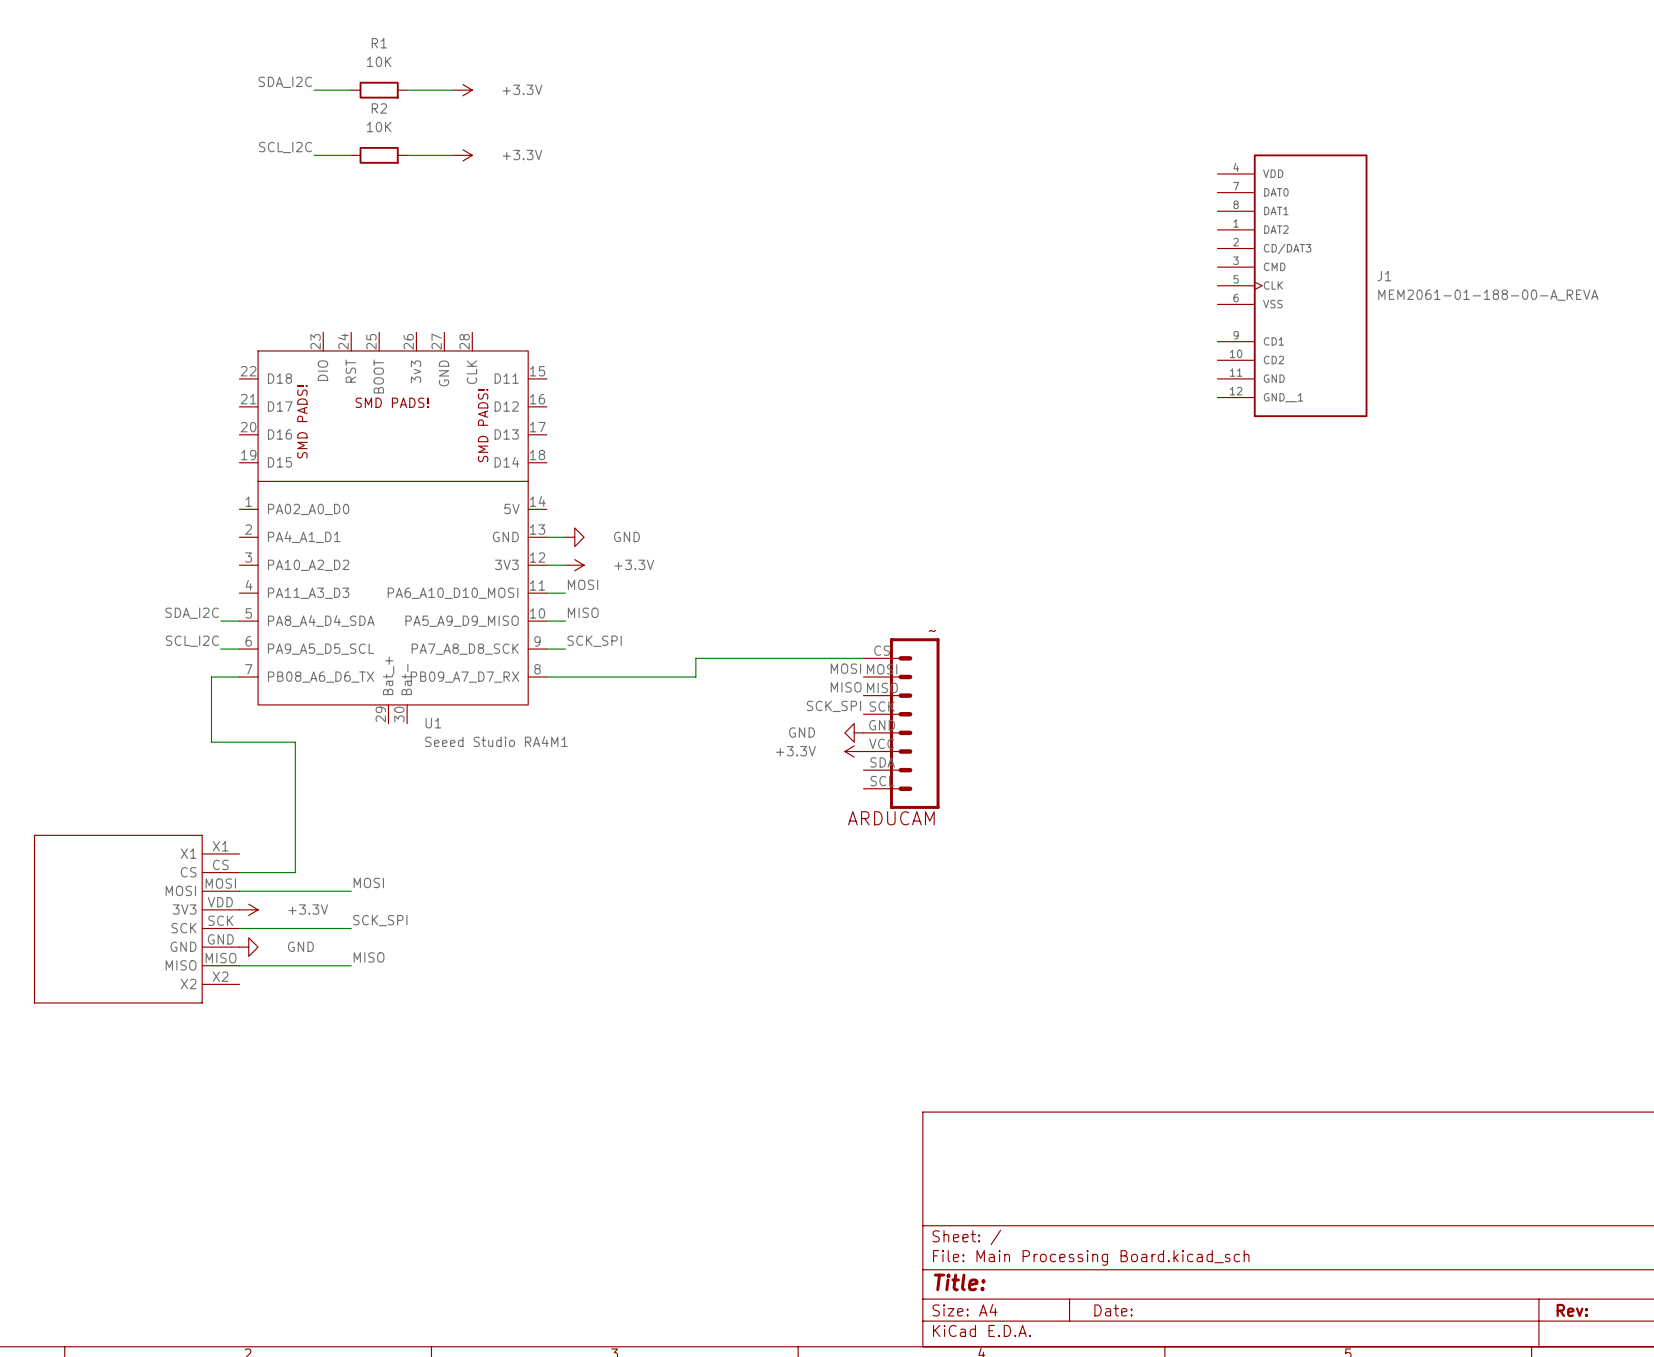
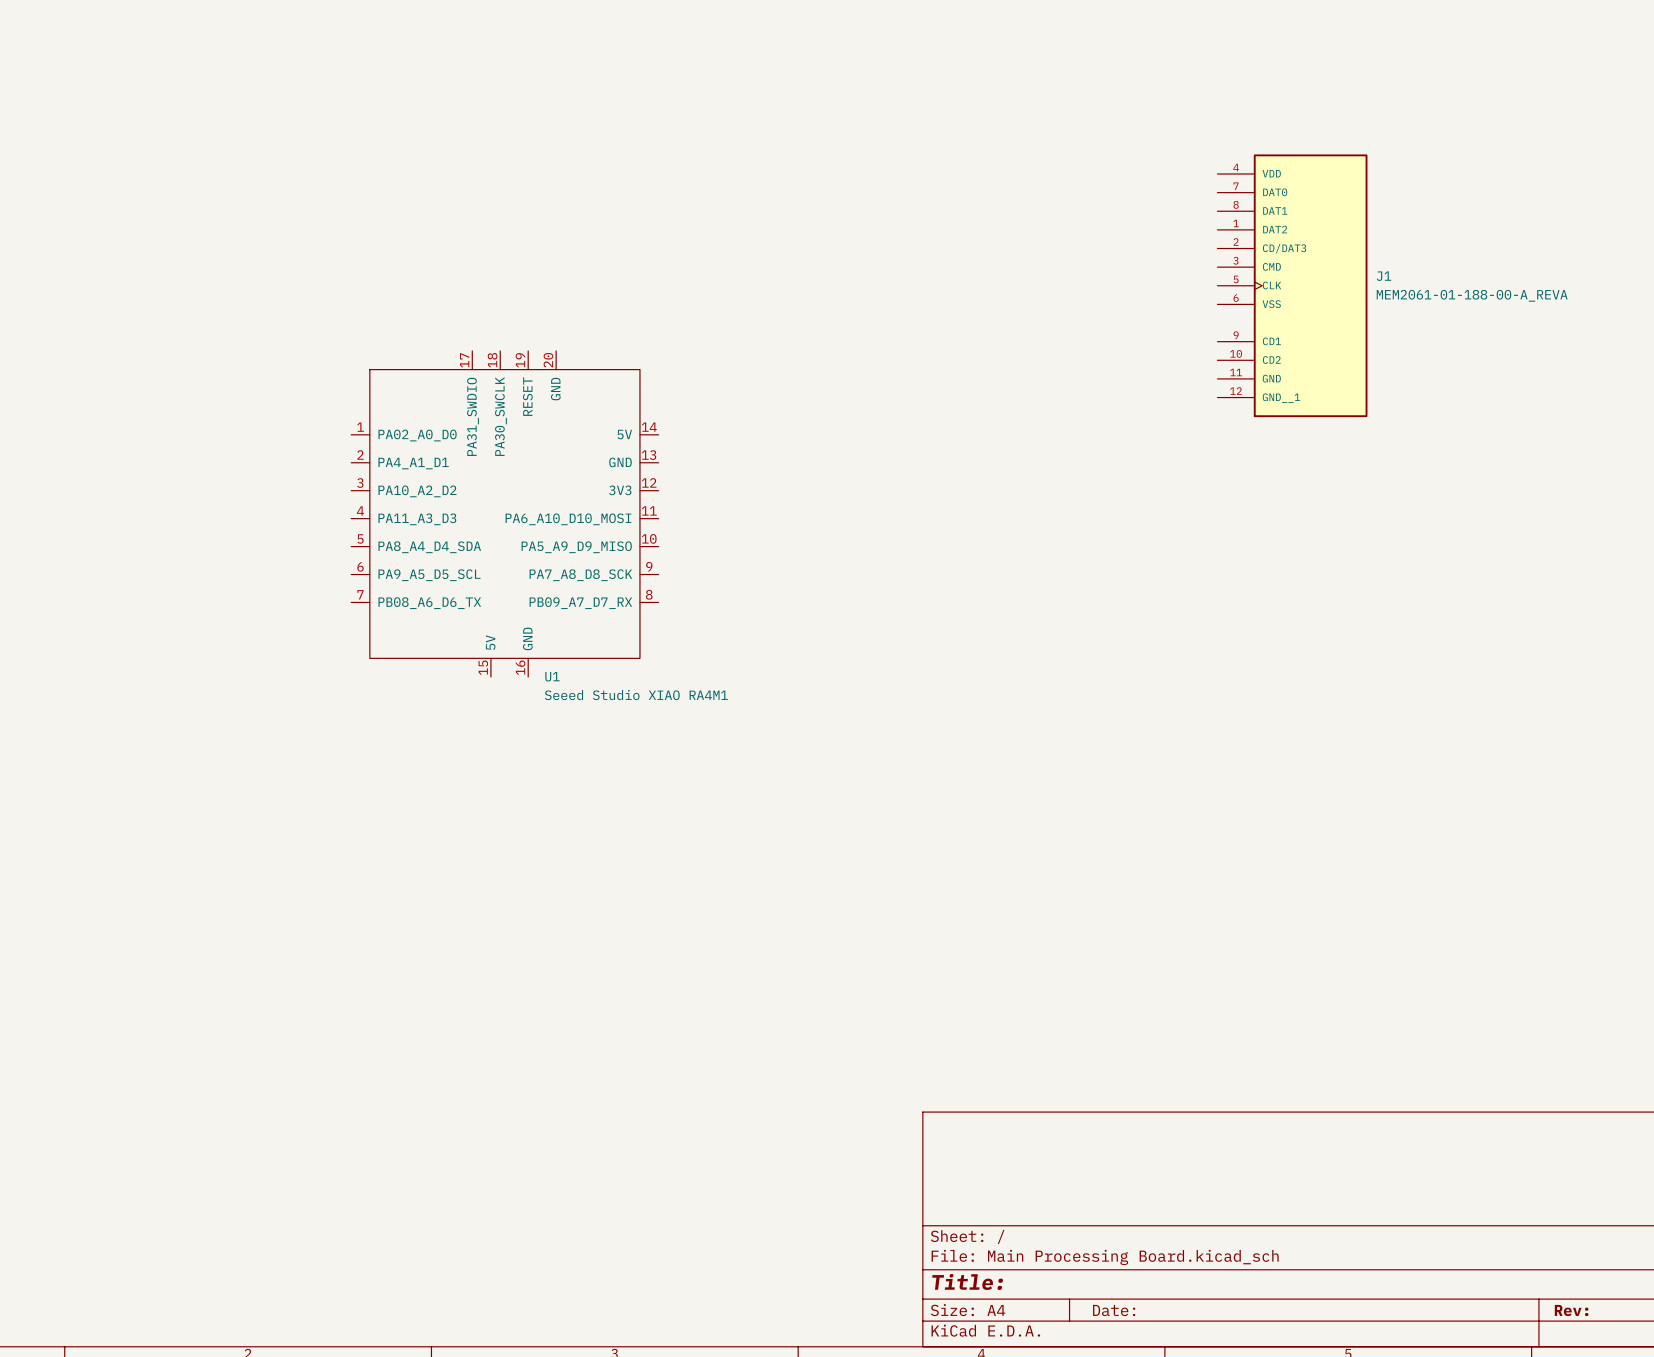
label: SDA_I2C (285, 82) -> none
wire: (313, 90) (351, 90) -> none
R1: 10K (379, 90) -> none
wire: (407, 90) (453, 90) -> none
power symbol: +3.3V (462, 90) -> none
label: SCL_I2C (285, 147) -> none
wire: (313, 155) (351, 155) -> none
R2: 10K (379, 155) -> none
wire: (407, 155) (453, 155) -> none
power symbol: +3.3V (462, 155) -> none
U1 symbol: [239, 332, 547, 724] -> [351, 350, 659, 677]
wire: (546, 537) (565, 537) -> none
power symbol: GND (574, 537) -> none
wire: (546, 565) (565, 565) -> none
power symbol: +3.3V (574, 565) -> none
label: MOSI (583, 584) -> none
wire: (546, 593) (565, 593) -> none
label: MISO (583, 612) -> none
label: SDA_I2C (192, 613) -> none
wire: (220, 621) (239, 621) -> none
wire: (546, 621) (565, 621) -> none
label: SCL_I2C (192, 641) -> none
label: SCK_SPI (594, 641) -> none
wire: (220, 649) (239, 649) -> none
wire: (546, 649) (565, 649) -> none
wire: (863, 658) (695, 658) (695, 676) (546, 676) -> none
label: MOSI (845, 668) -> none
wire: (239, 676) (211, 676) (211, 742) (295, 742) (295, 872) (239, 872) -> none
label: MISO (846, 687) -> none
label: SCK_SPI (833, 706) -> none
U1 name position: U1 (433, 723) -> U1 (552, 676)
part: (901, 723) -> none
power symbol: GND (854, 732) -> none
U1 value: Seeed Studio RA4M1 (496, 741) -> Seeed Studio XIAO RA4M1 (636, 695)
power symbol: +3.3V (854, 751) -> none
label: MOSI (368, 882) -> none
wire: (239, 891) (351, 891) -> none
power symbol: +3.3V (248, 909) -> none
part: (136, 919) -> none
label: SCK_SPI (380, 920) -> none
wire: (239, 928) (351, 928) -> none
power symbol: GND (248, 947) -> none
label: MISO (369, 957) -> none
wire: (239, 965) (351, 965) -> none

